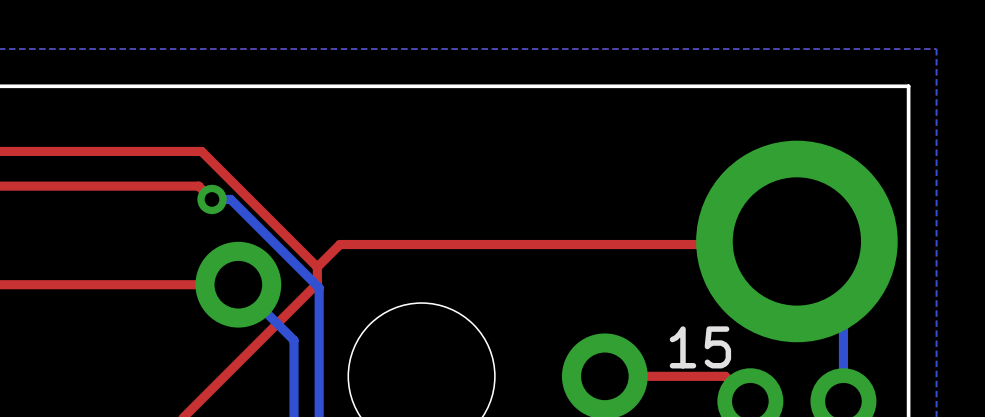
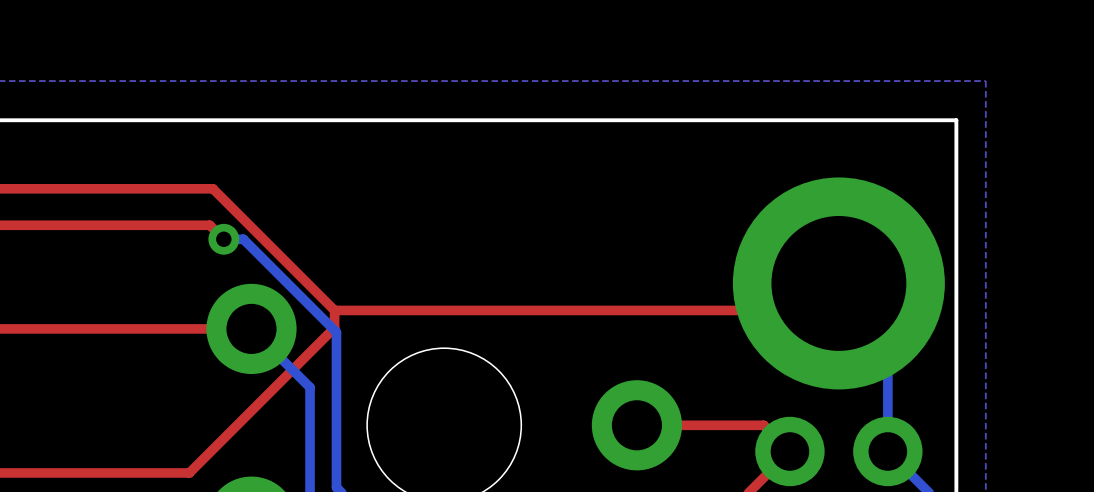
top track: (748, 244) (339, 244) (317, 267) -> (838, 283) (811, 310) (334, 310)
text: 15 (700, 347) -> none

